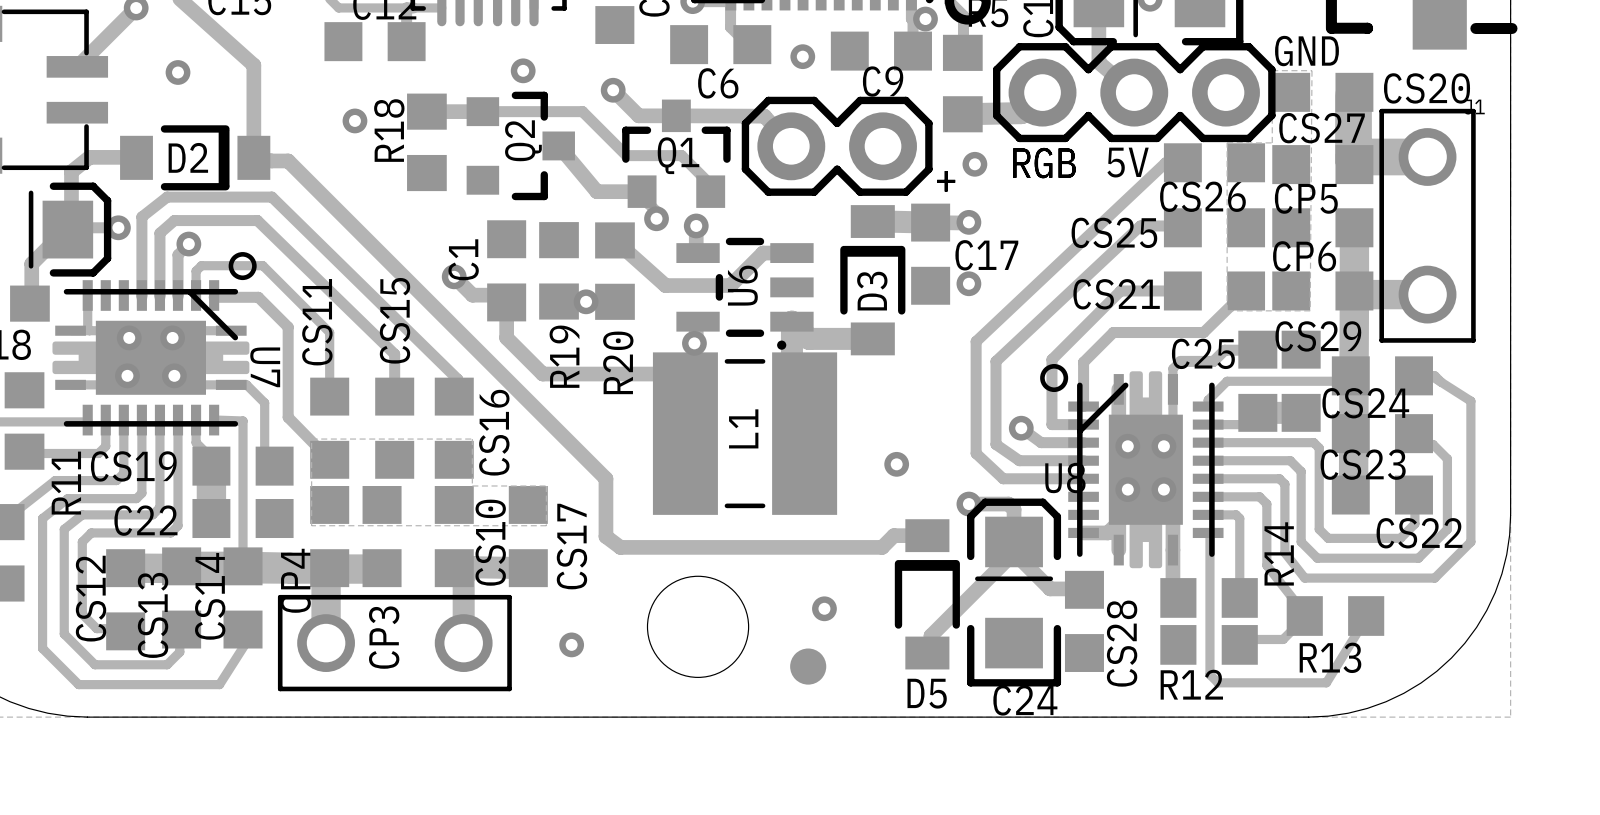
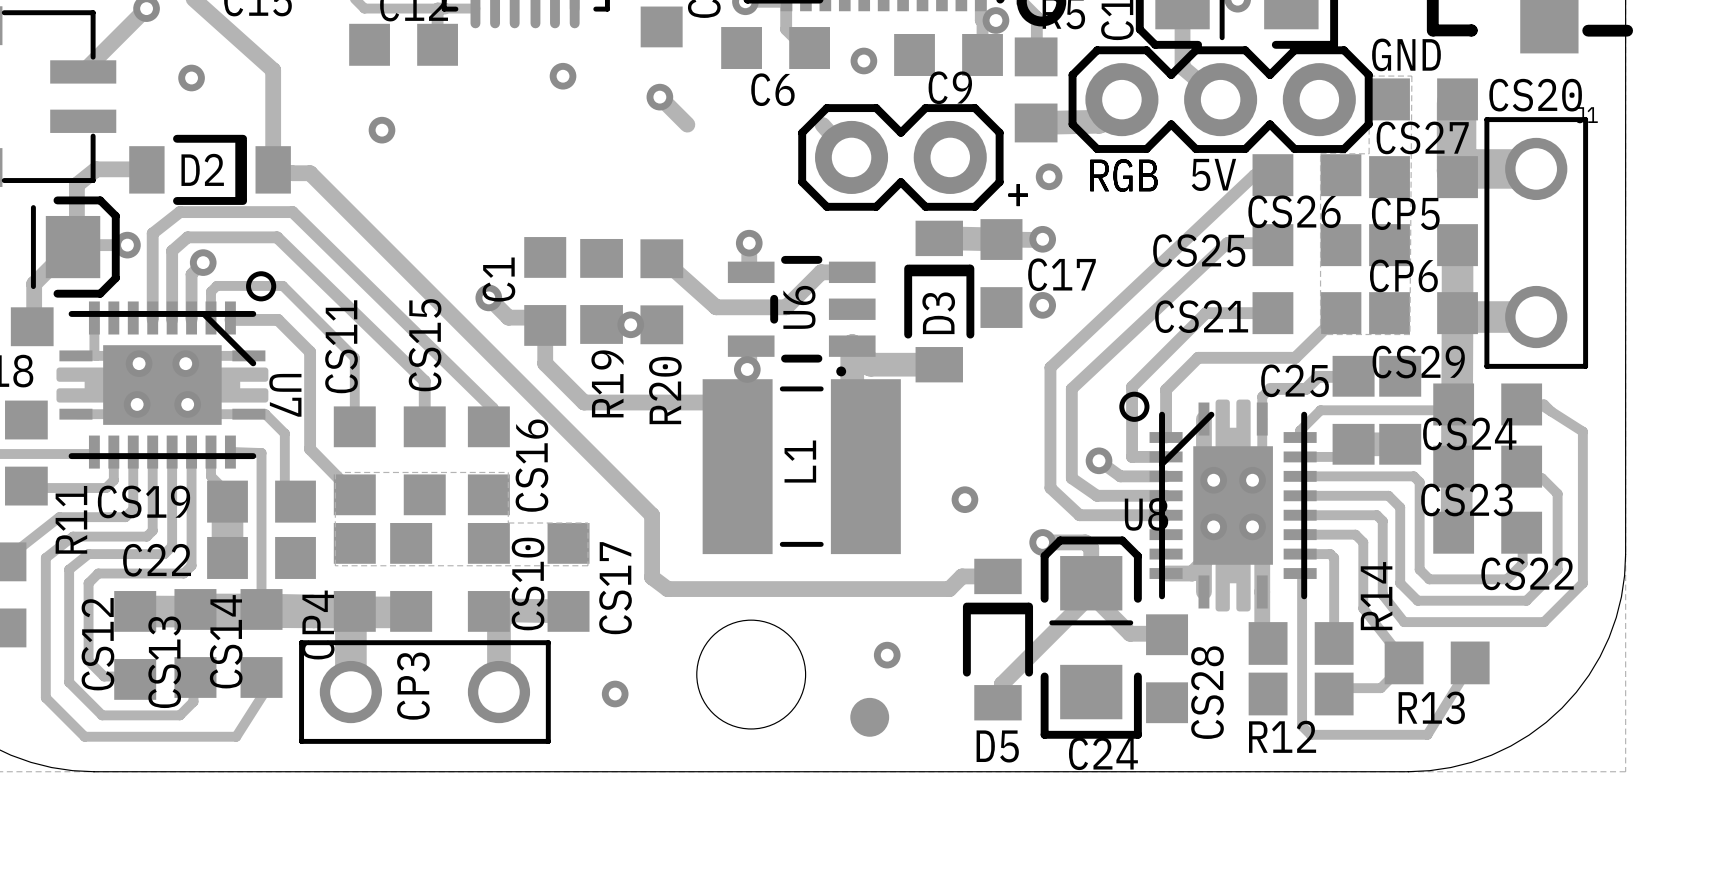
track: (426, 111) (582, 111) (626, 155) (681, 155) (710, 184) (710, 191) -> none
track: (638, 115) (764, 116) -> none
R18: (426, 142) -> none
Q2: (520, 145) -> none
track: (558, 145) (596, 191) (649, 191) (649, 204) (656, 211) (656, 218) -> none
Q1: (676, 153) -> none
via: (656, 218) -> none

